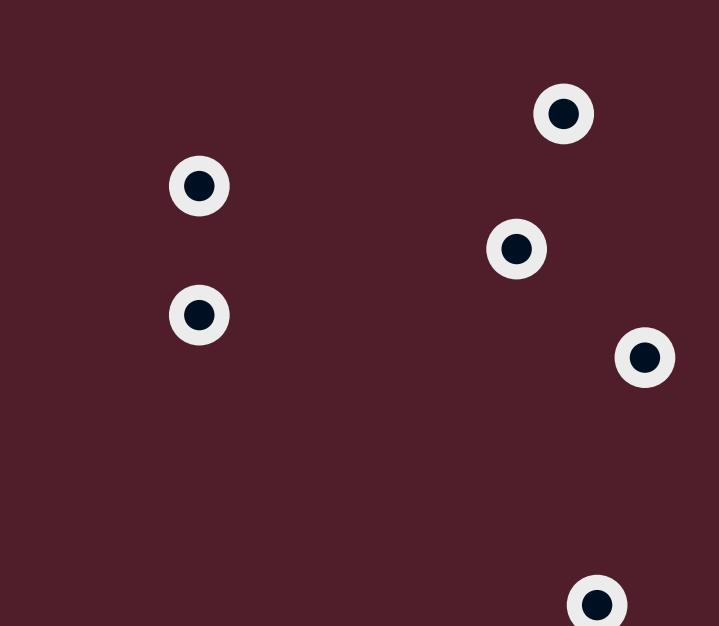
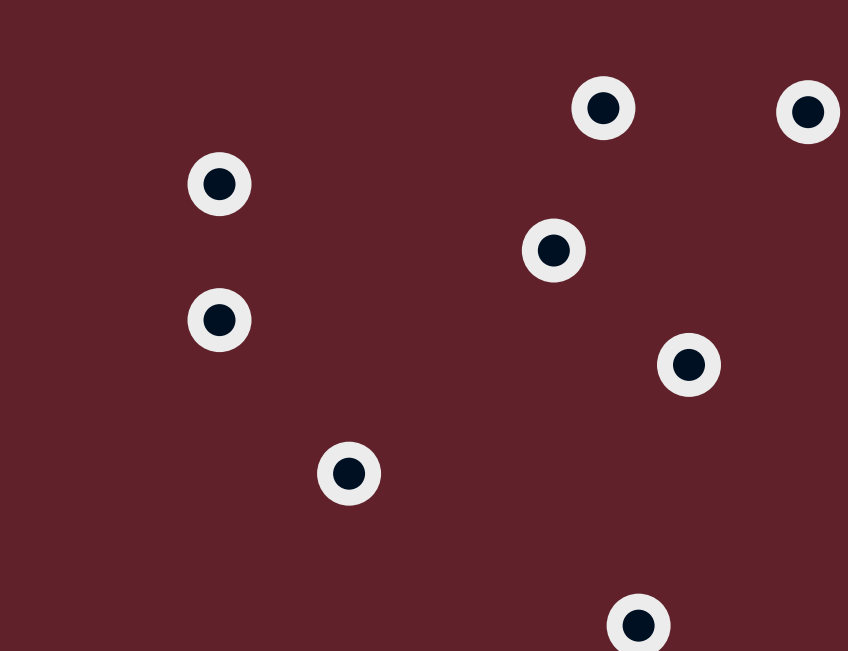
via: none -> (349, 473)

